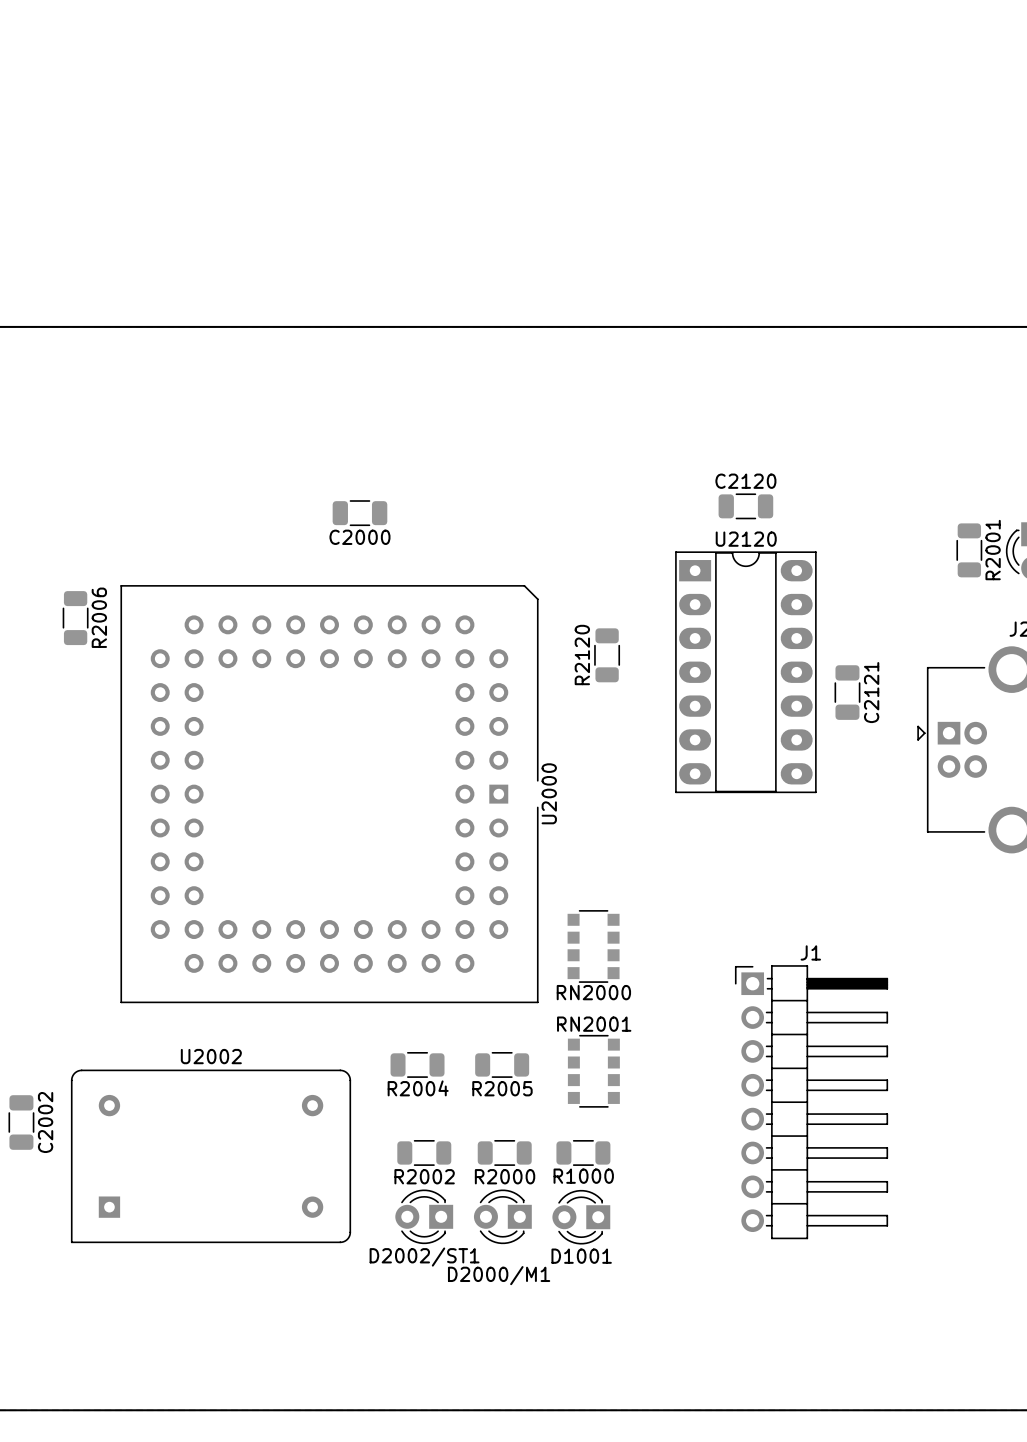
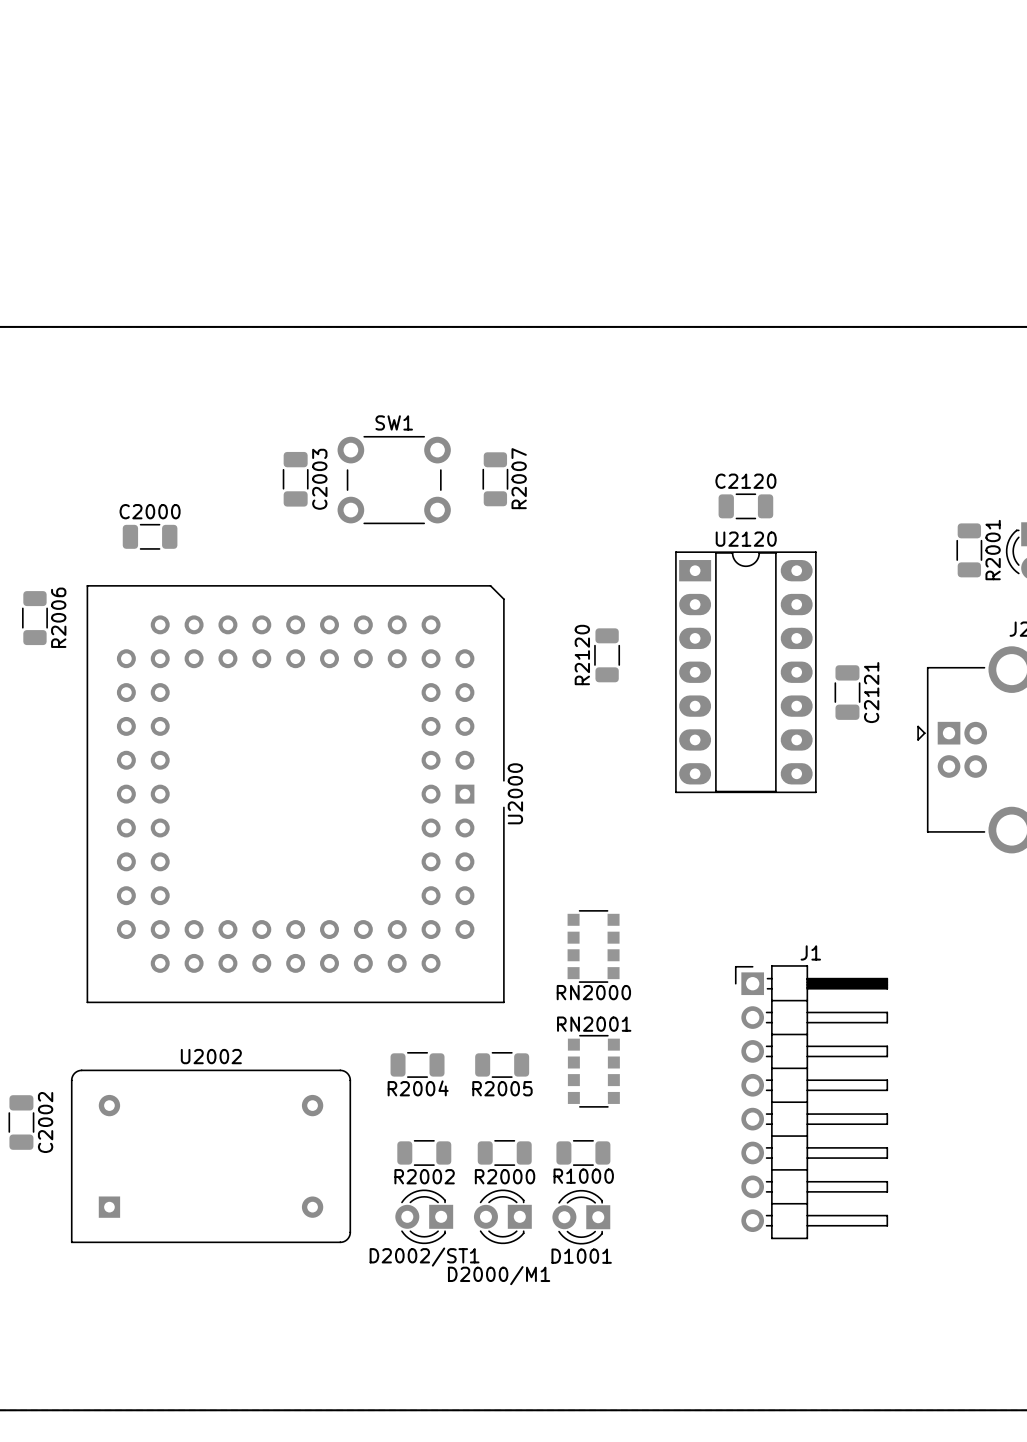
C2003: none -> (295, 479)
R2007: none -> (495, 479)
SW1: none -> (394, 480)
C2000 position: (359, 513) -> (150, 536)
C2000 name position: C2000 (359, 537) -> C2000 (150, 511)
R2006 position: (75, 618) -> (34, 618)
U2000 position: (329, 794) -> (295, 794)

